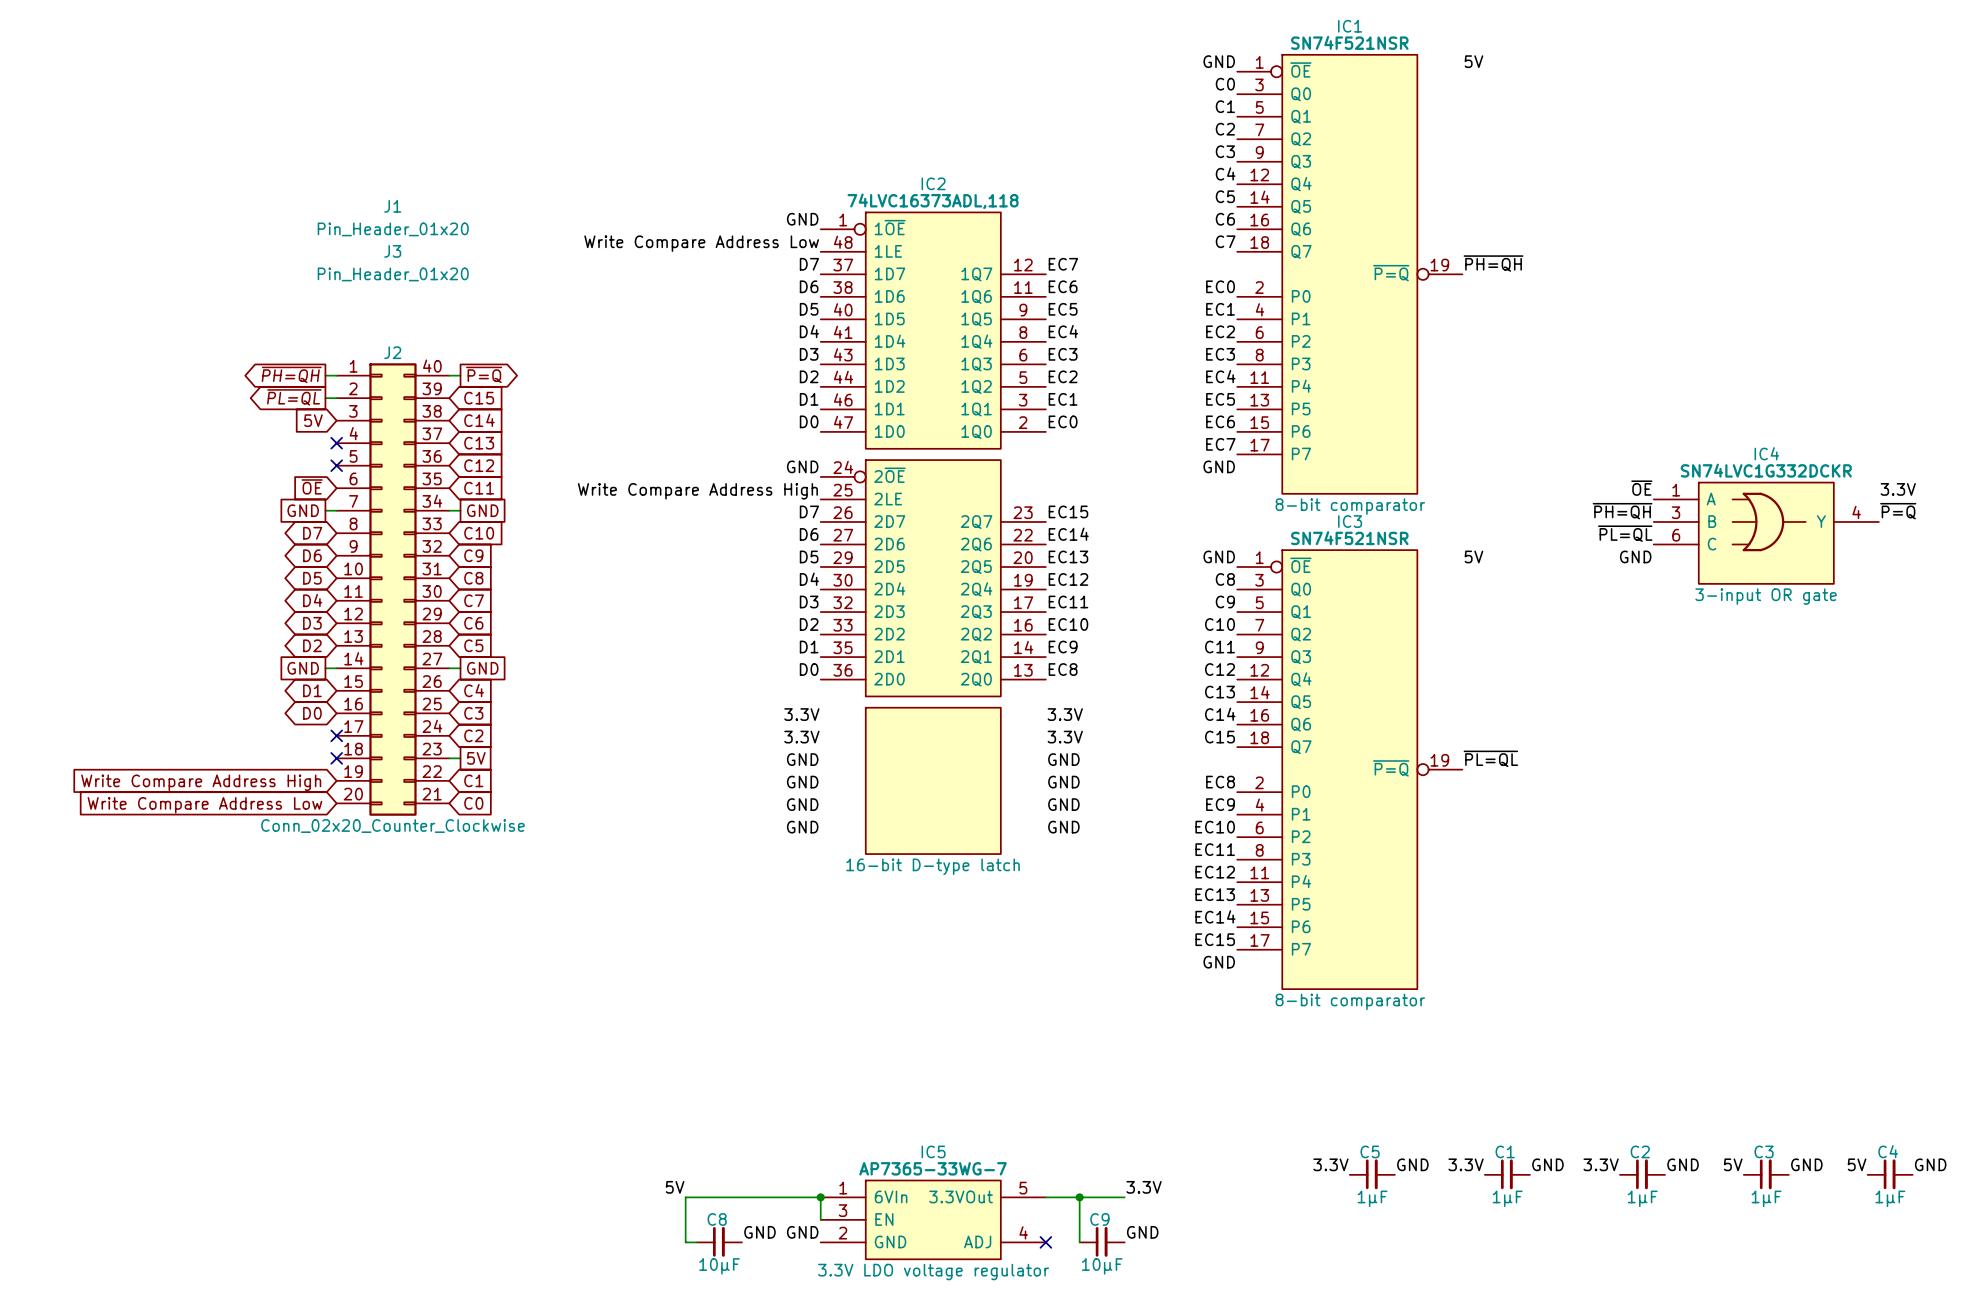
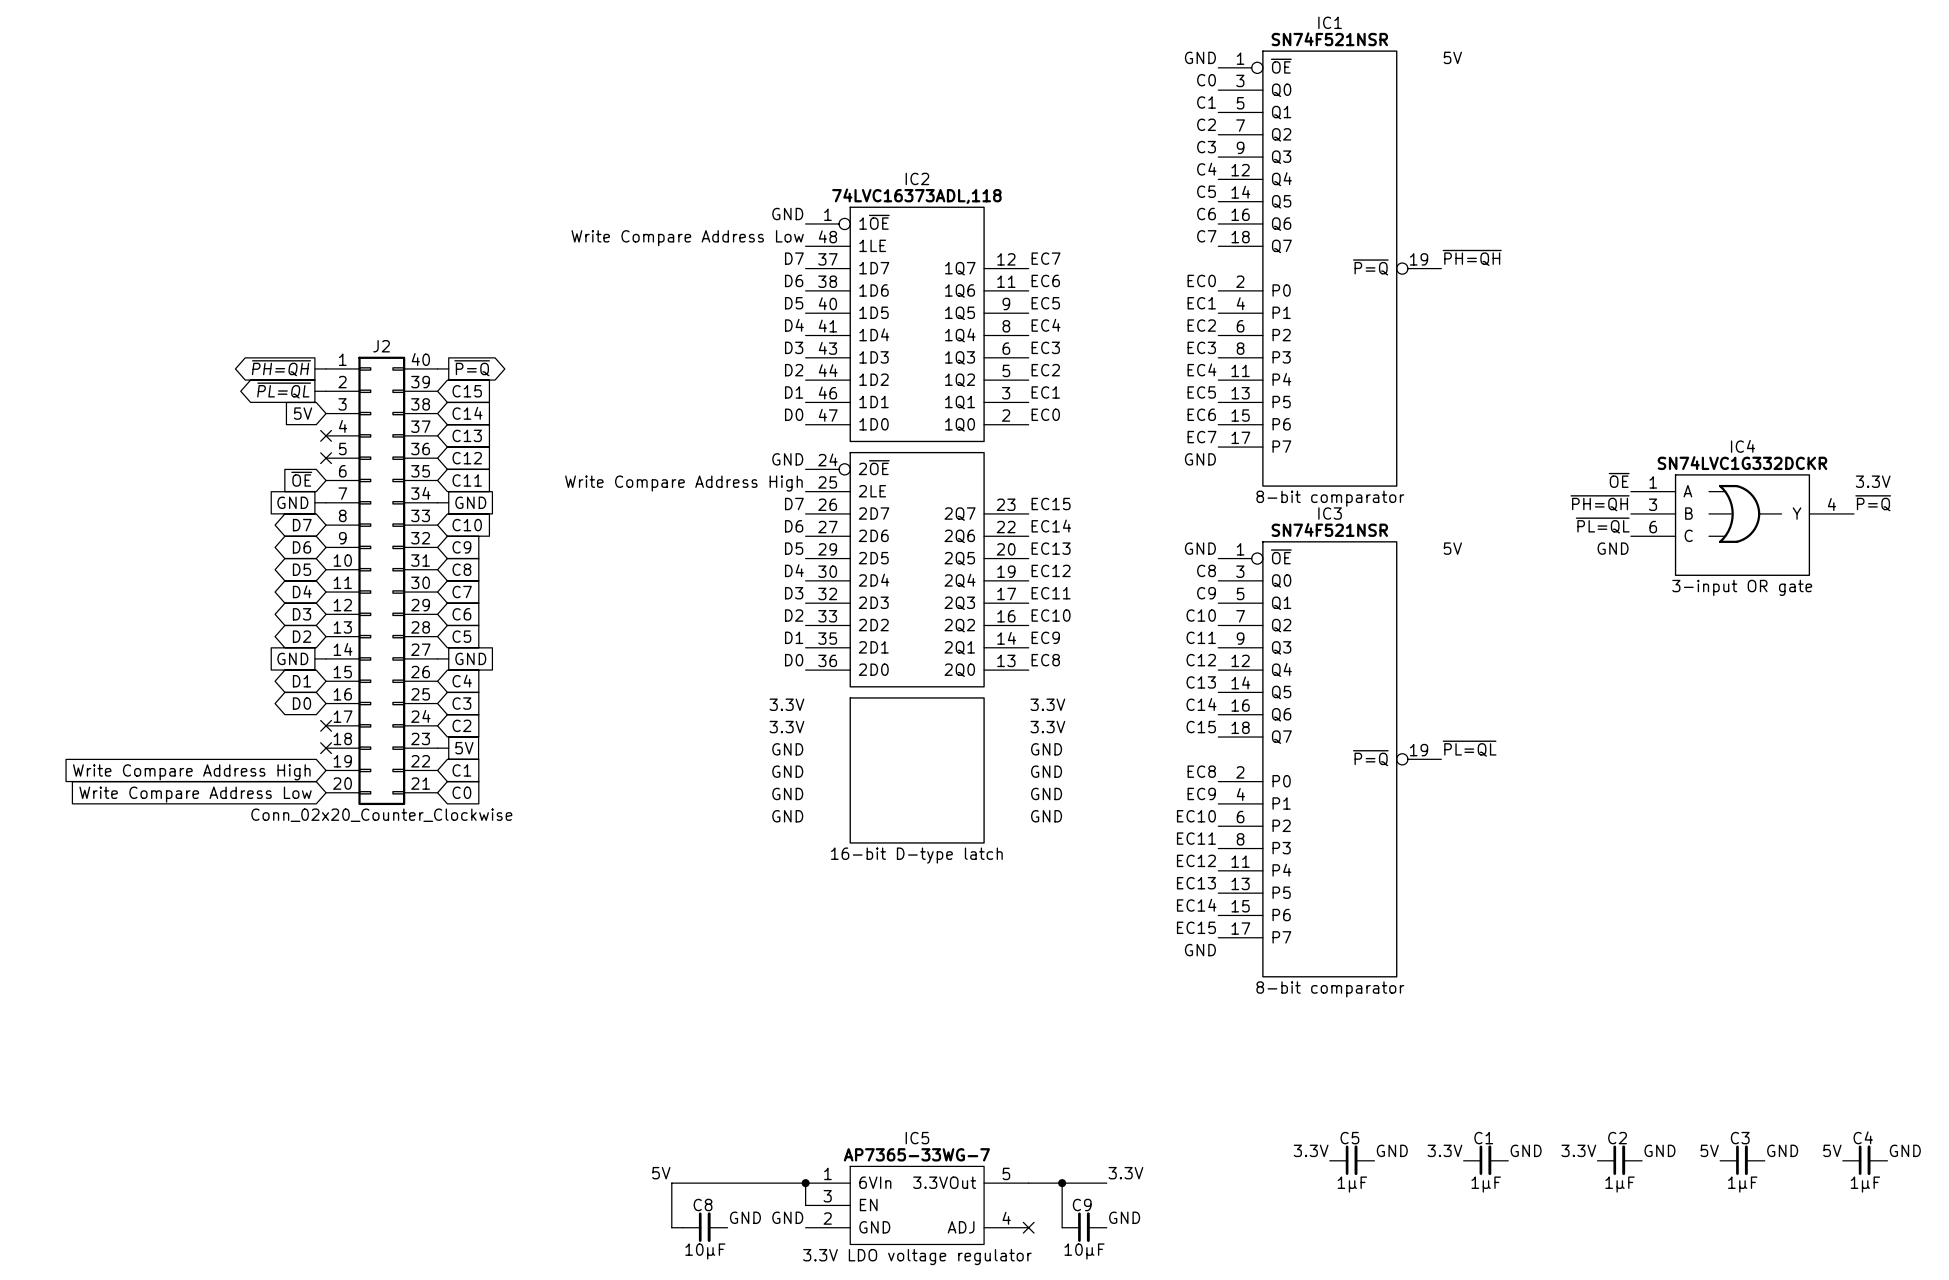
J1: Pin_Header_01x20 (393, 218) -> none
J3: Pin_Header_01x20 (393, 263) -> none

